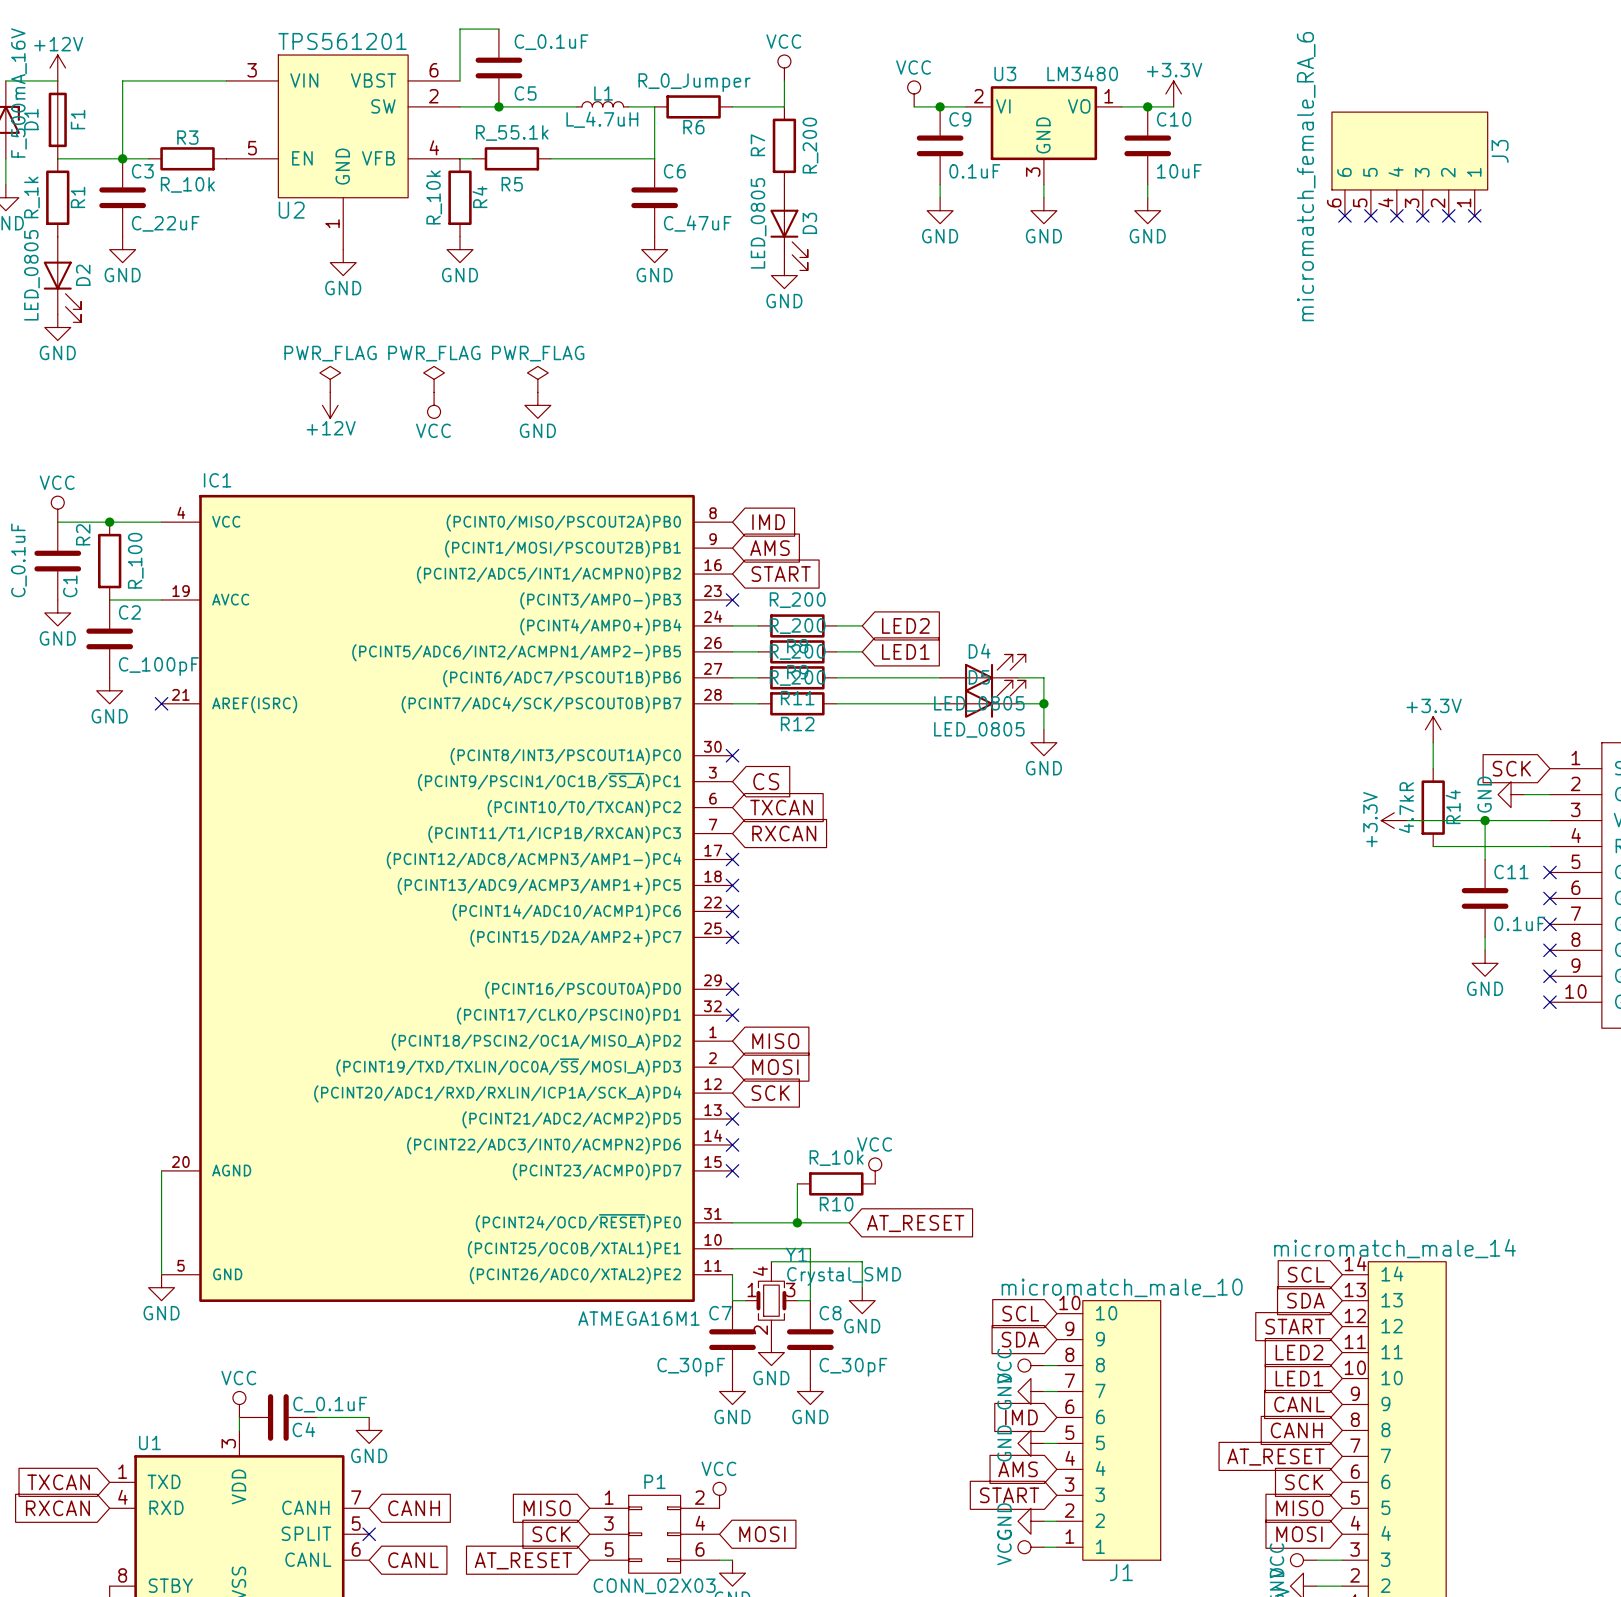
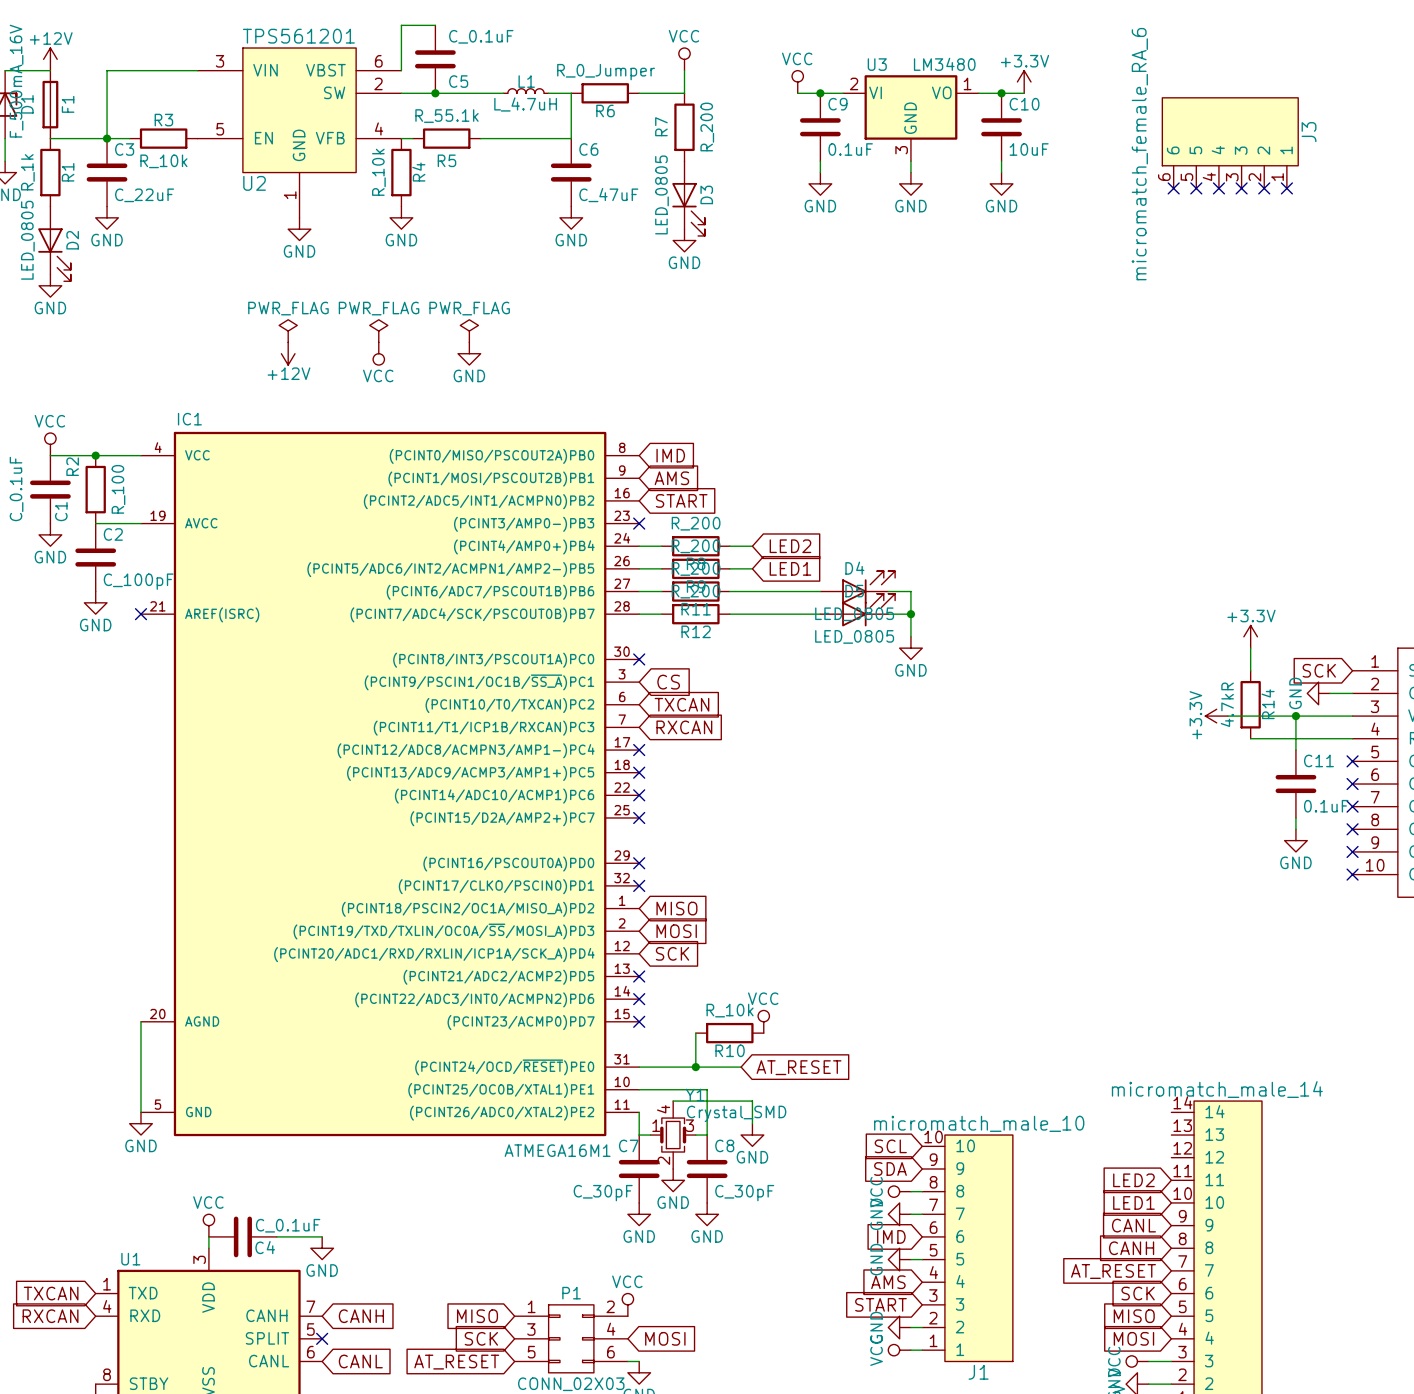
global label: SCL (1306, 1274) -> none
global label: SDA (1305, 1300) -> none
global label: START (1295, 1326) -> none

